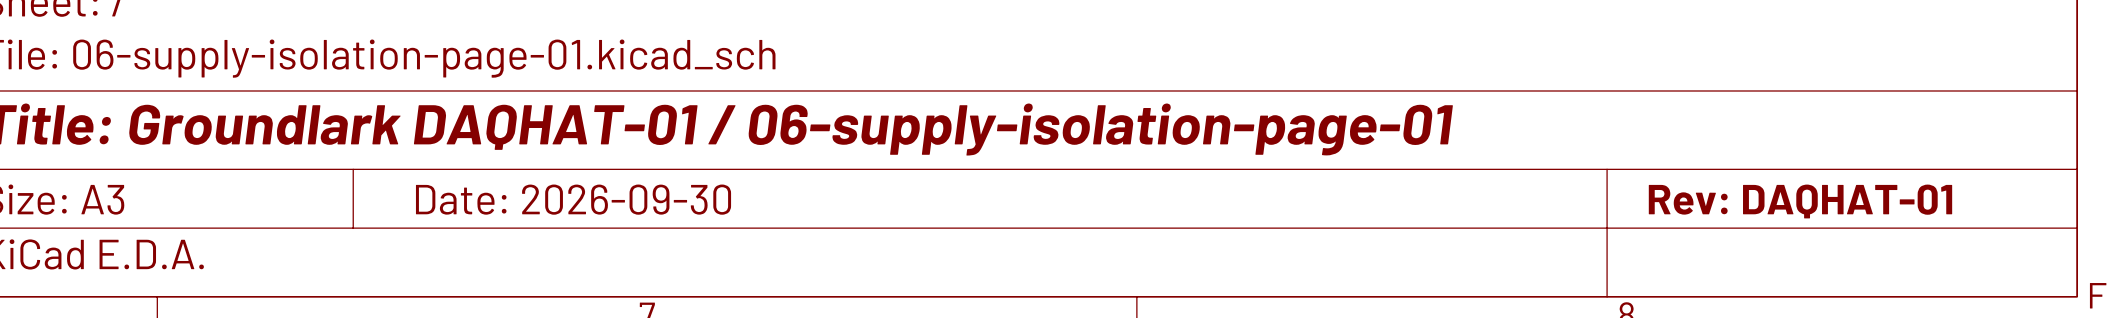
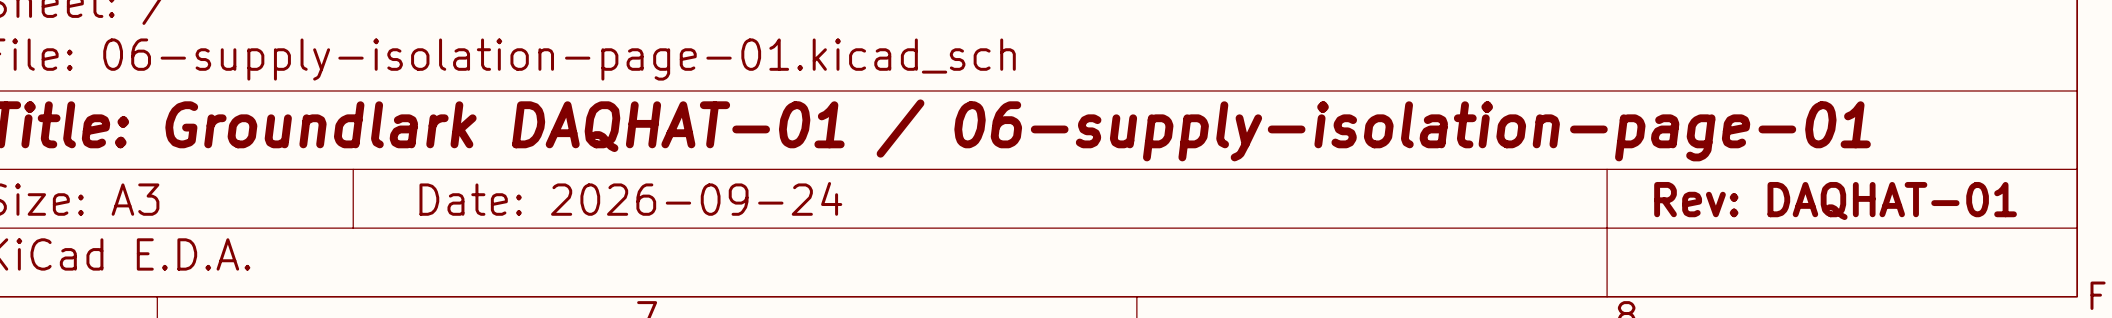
title block: Date: 2026-09-30 (573, 199) -> Date: 2026-09-24 (630, 198)

